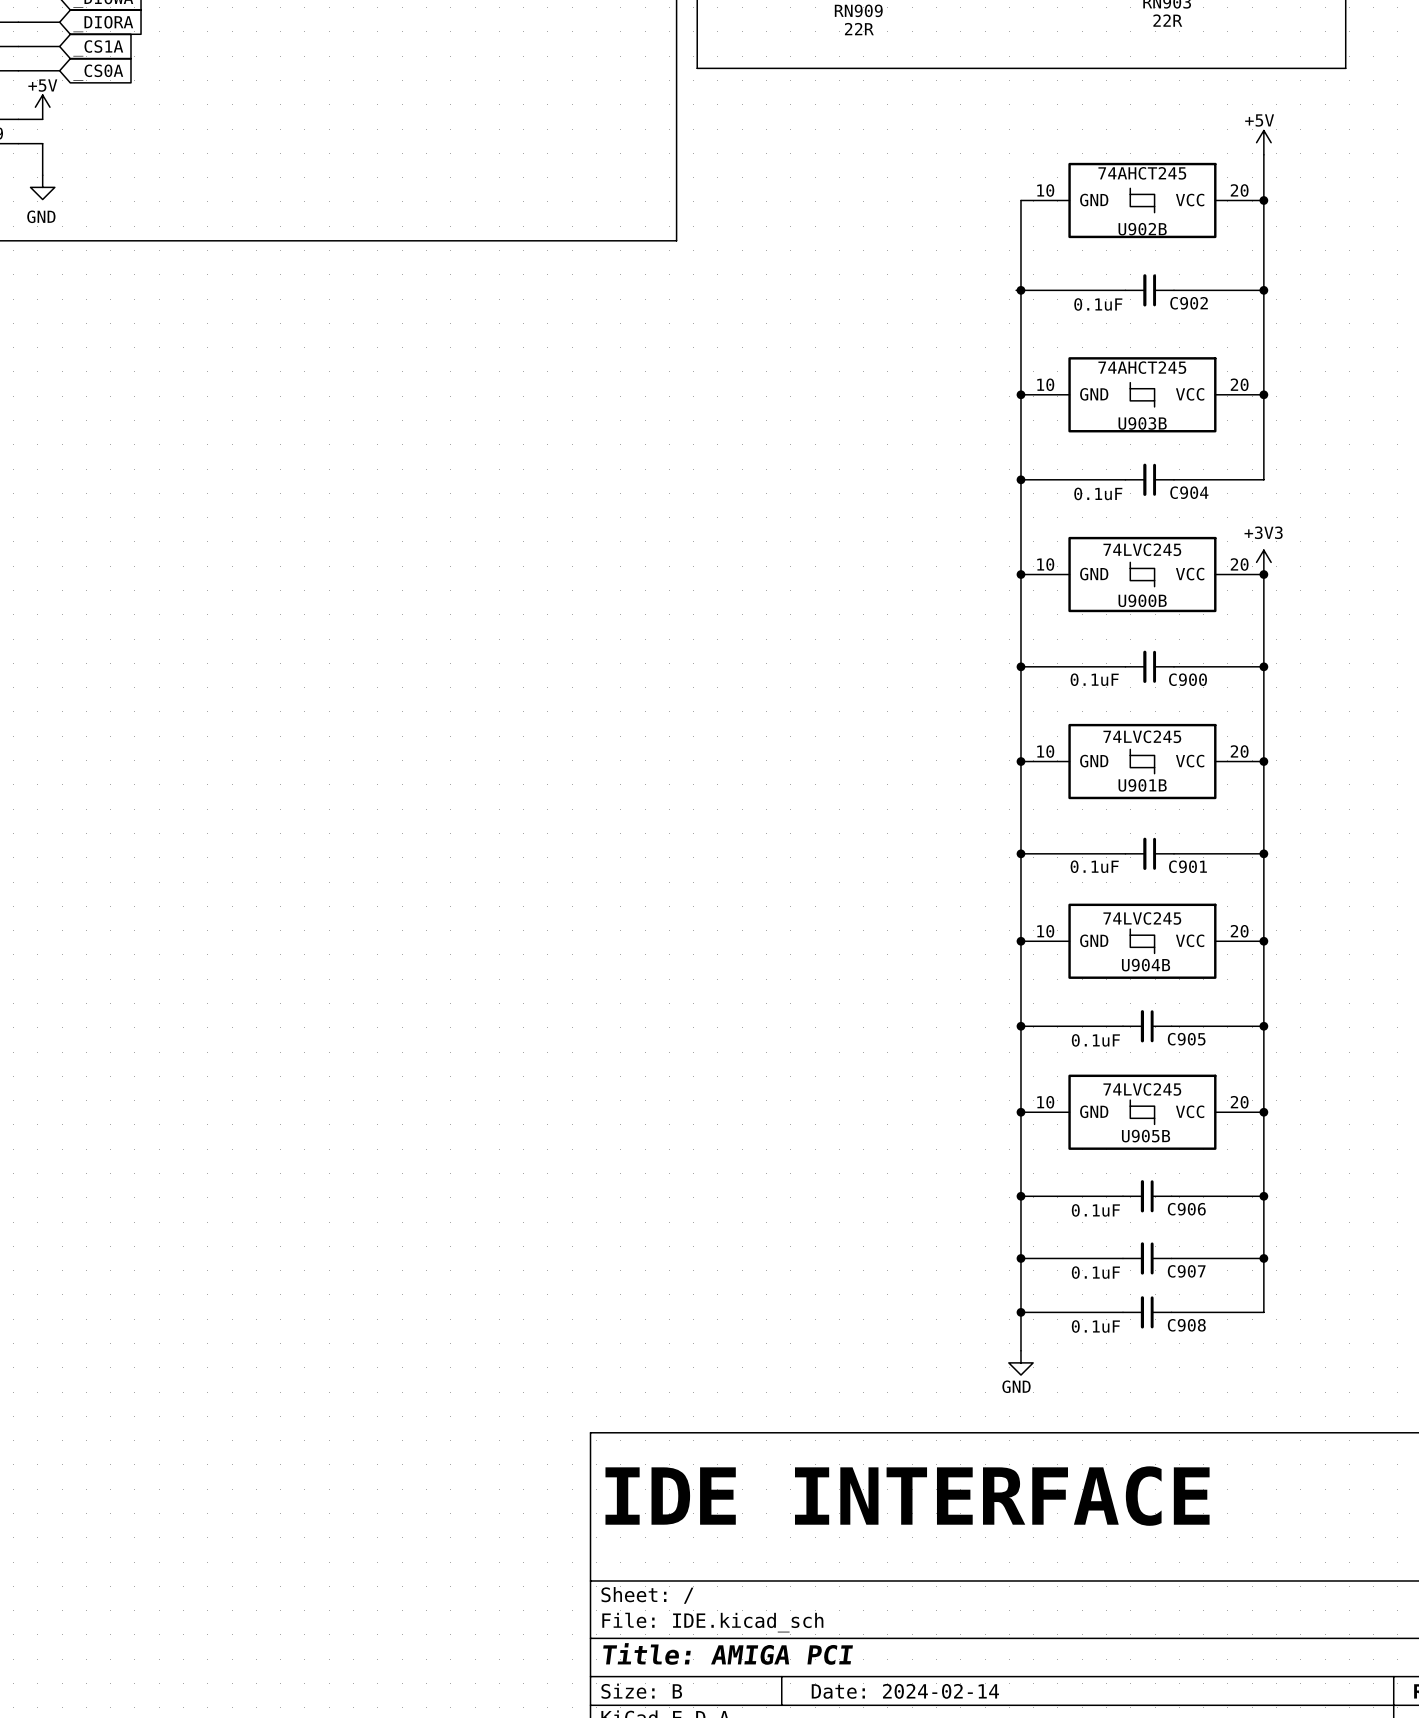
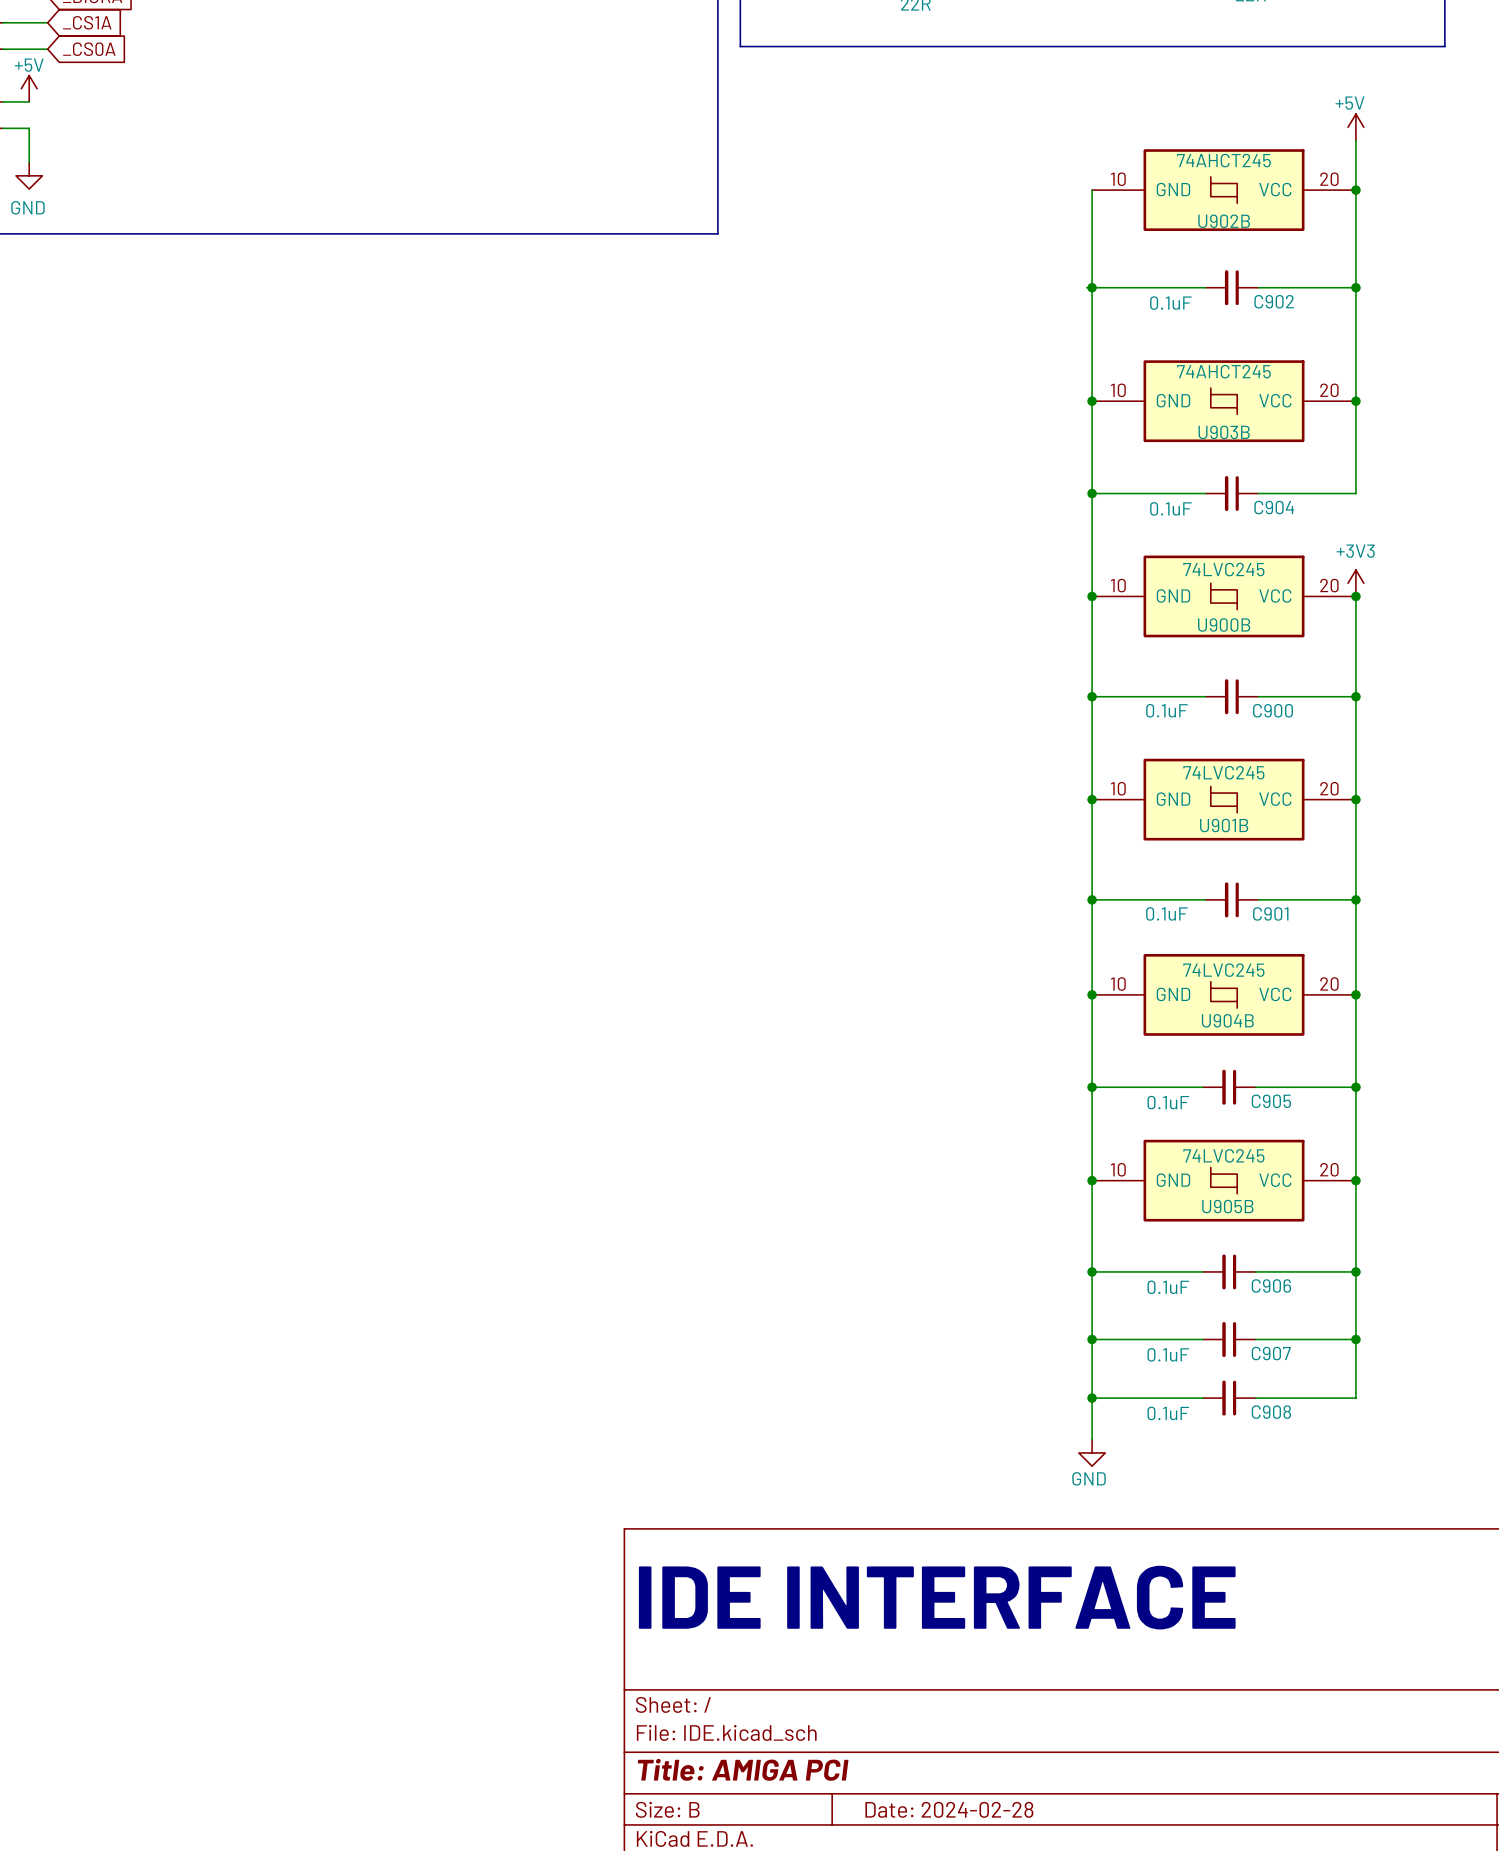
title block: Date: 2024-02-14 (905, 1691) -> Date: 2024-02-28 (949, 1809)

